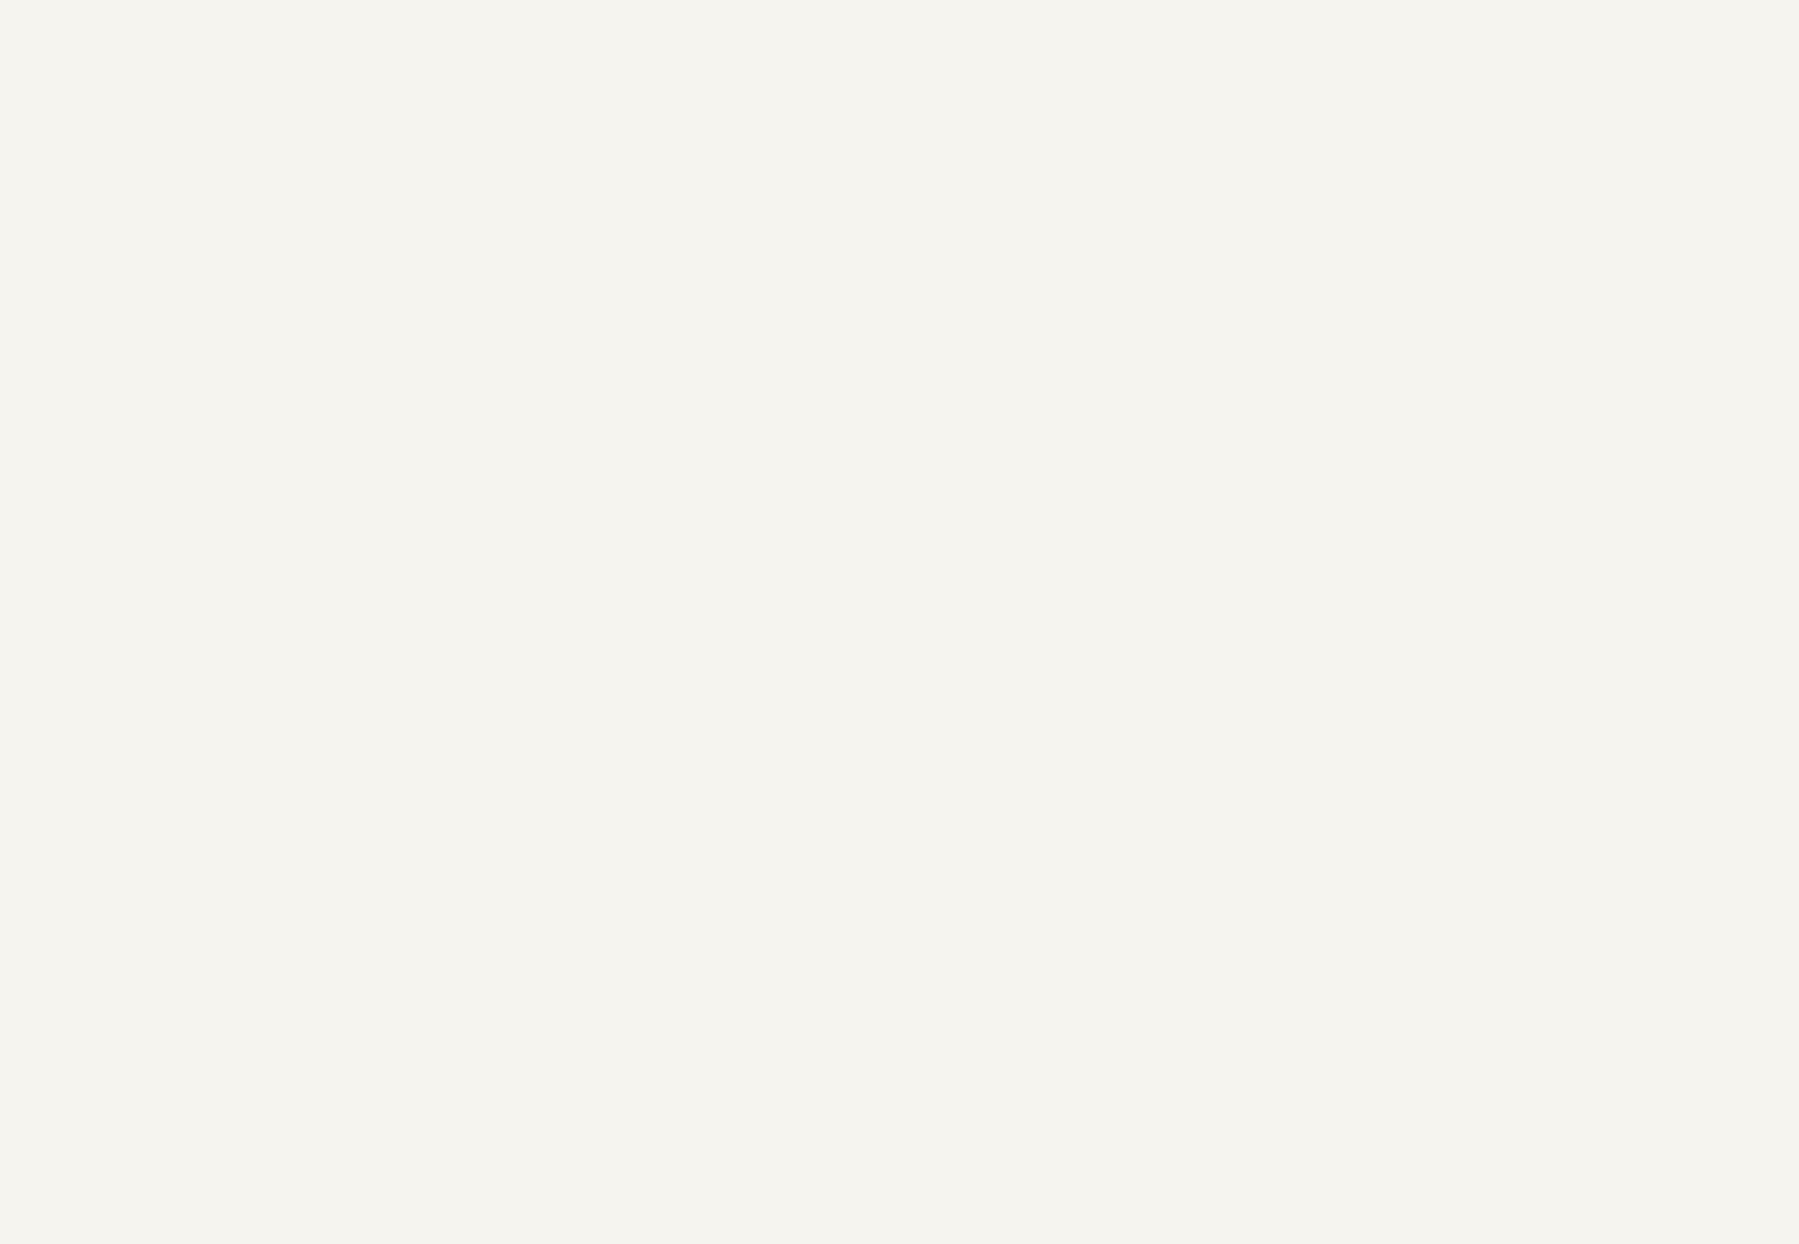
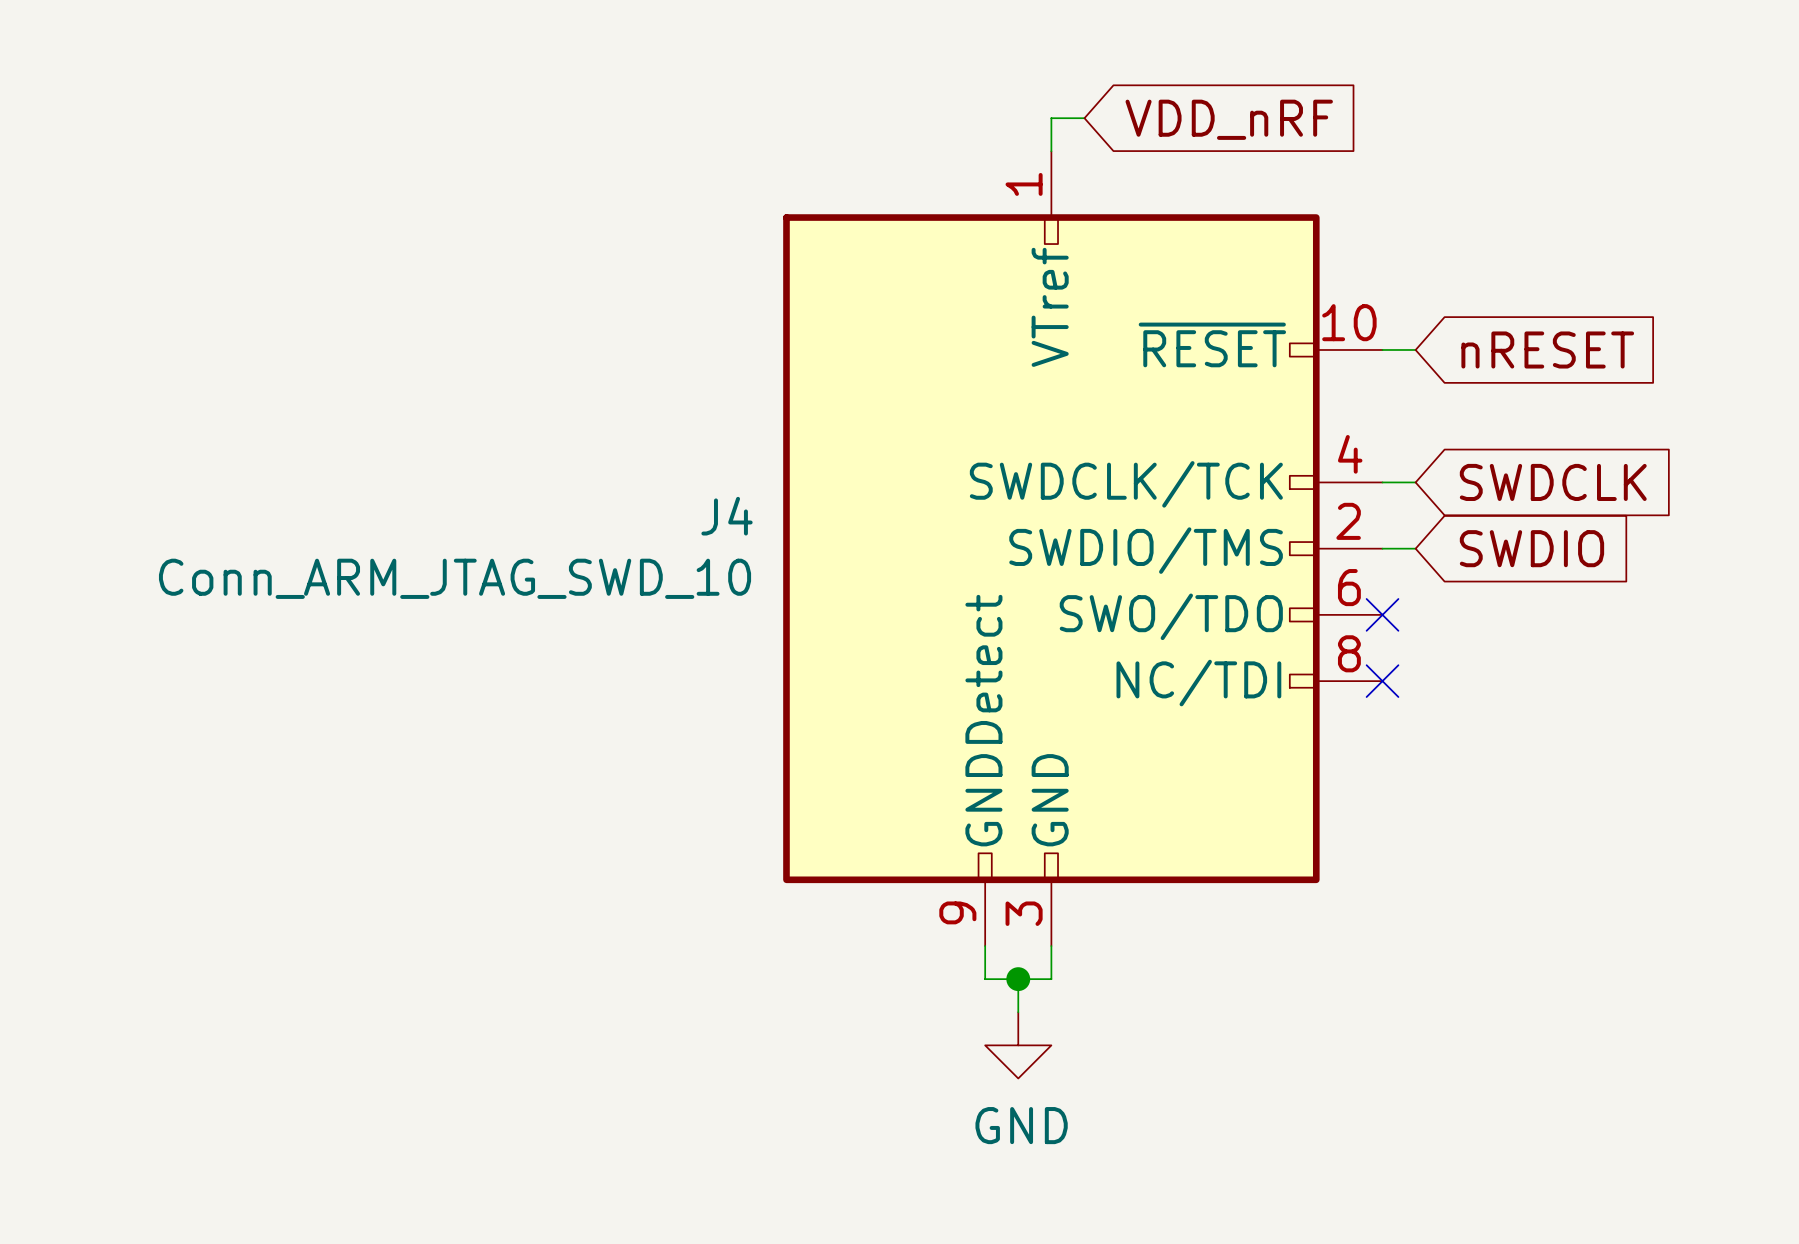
wire: none -> (1084, 118) (1051, 118) (1051, 151)
global label: none -> VDD_nRF (1229, 119)
wire: none -> (1382, 349) (1415, 349)
global label: none -> nRESET (1547, 349)
wire: none -> (1382, 482) (1415, 482)
global label: none -> SWDCLK (1553, 482)
J4: none -> Conn_ARM_JTAG_SWD_10 (1082, 548)
wire: none -> (1382, 548) (1415, 548)
global label: none -> SWDIO (1531, 548)
no-connect mark: none -> (1382, 614)
no-connect mark: none -> (1382, 681)
wire: none -> (985, 946) (985, 979) (1051, 979) (1051, 946)
wire: none -> (1018, 979) (1018, 1012)
junction: none -> (1018, 979)
power symbol: none -> GND (1018, 1045)

